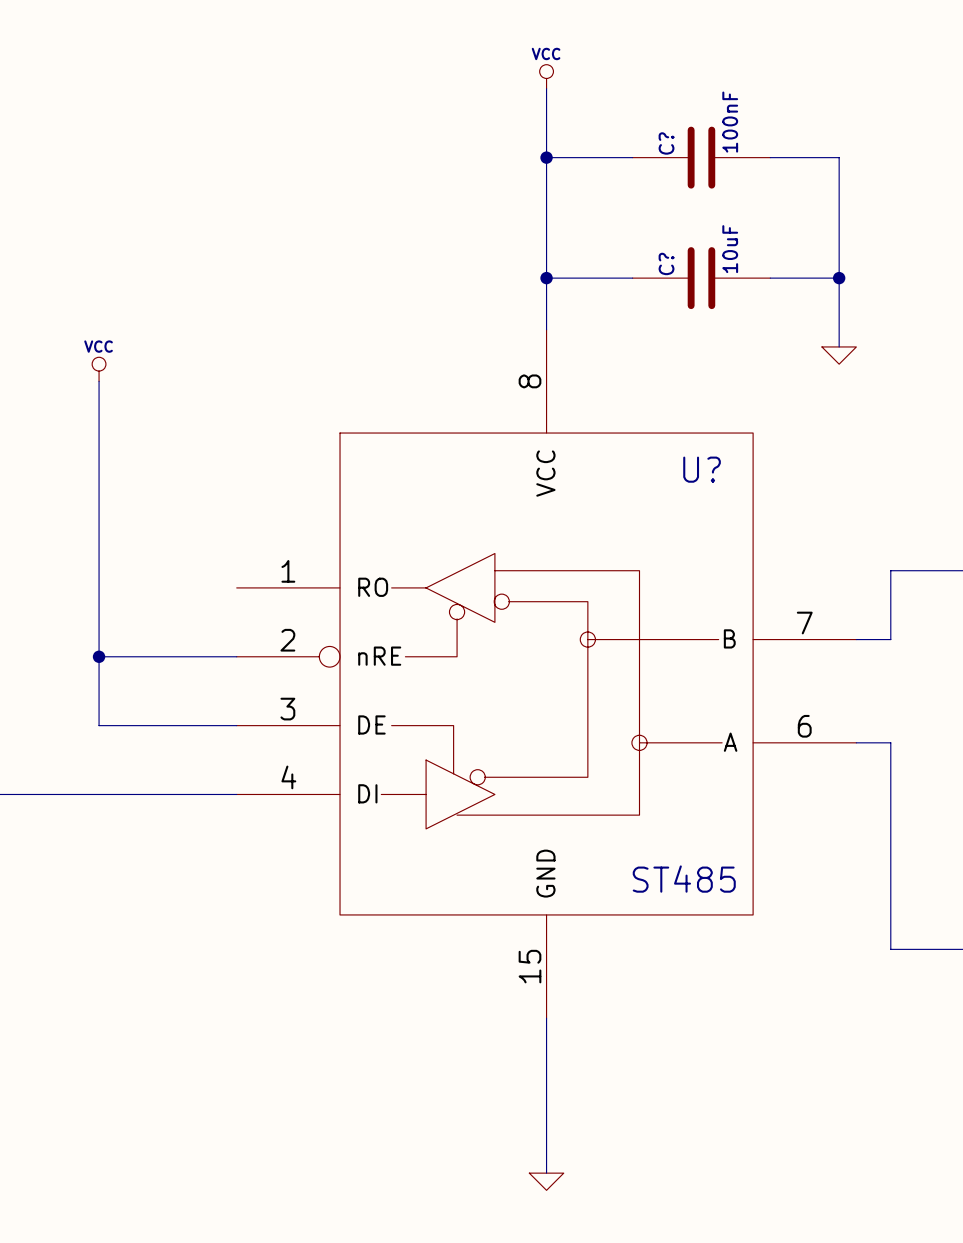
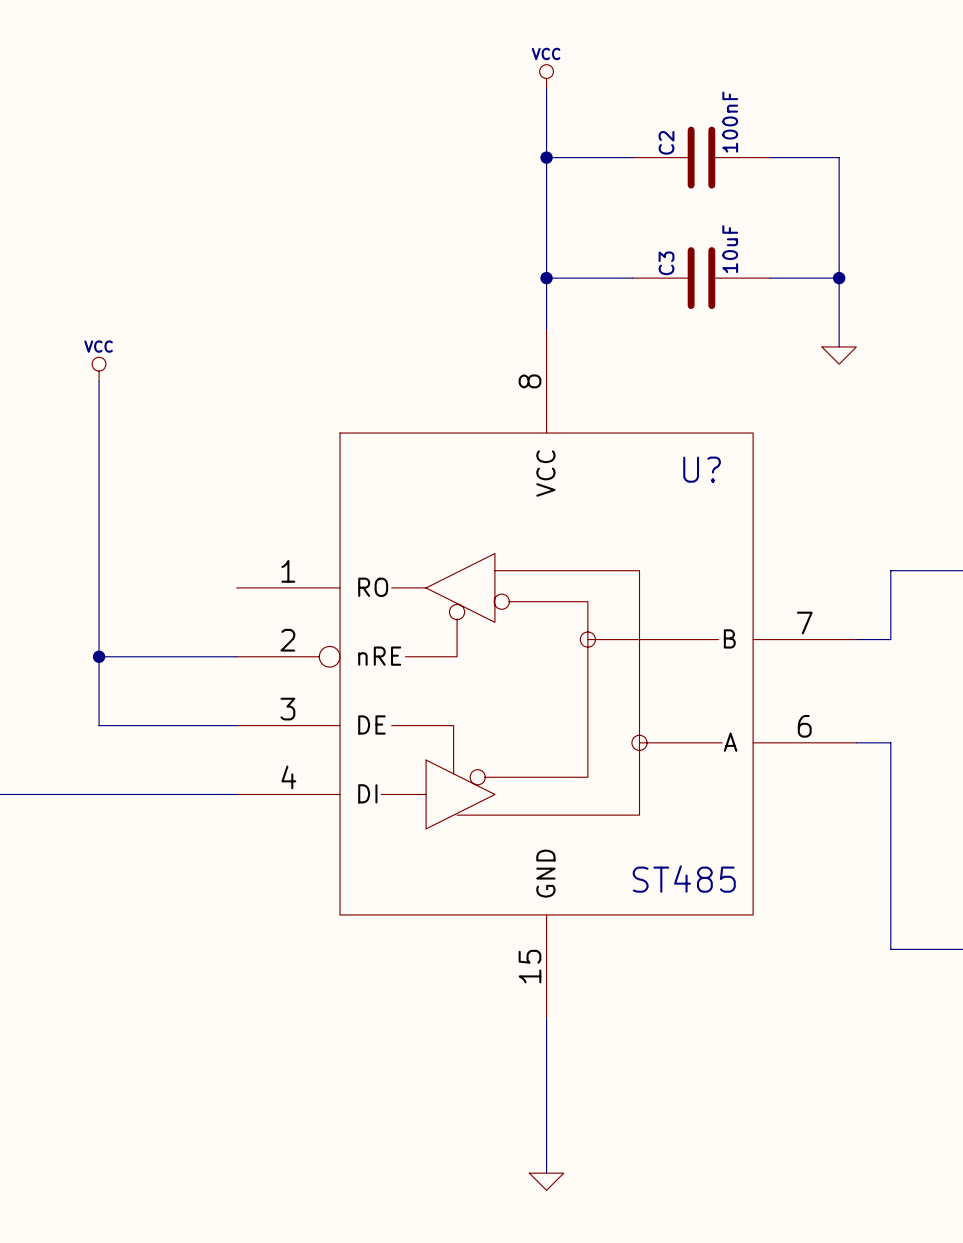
C? name: C? (666, 143) -> C2 (666, 142)
C? name: C? (666, 263) -> C3 (666, 263)

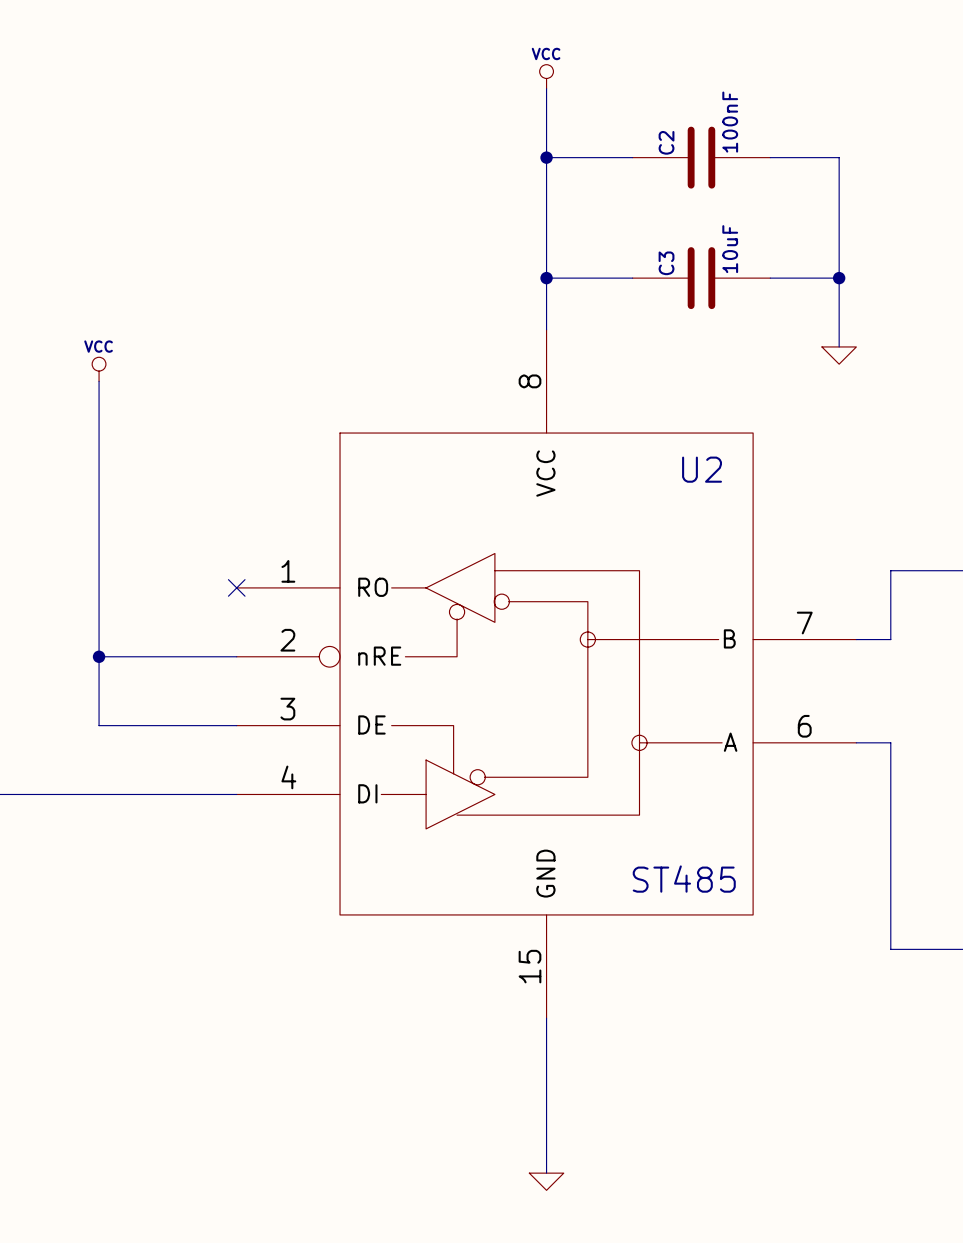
U? name: U? (702, 469) -> U2 (702, 469)
no-connect mark: none -> (236, 587)

